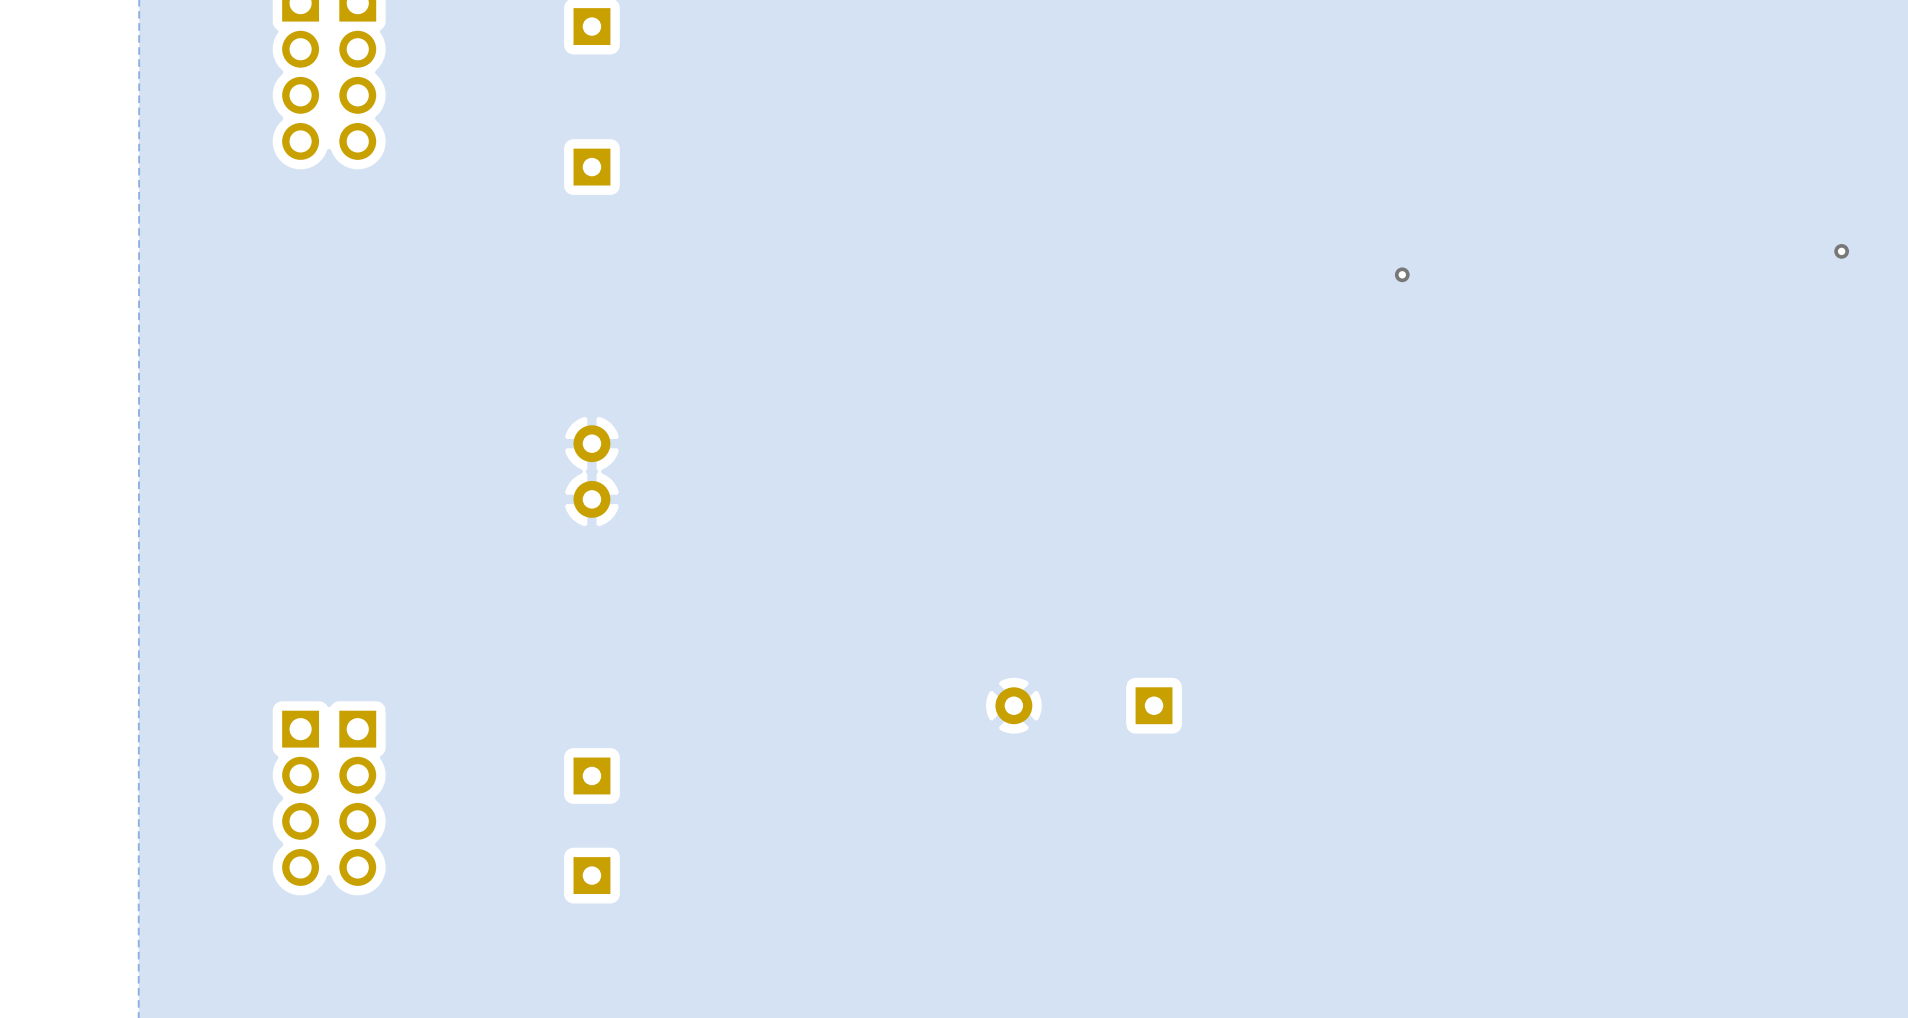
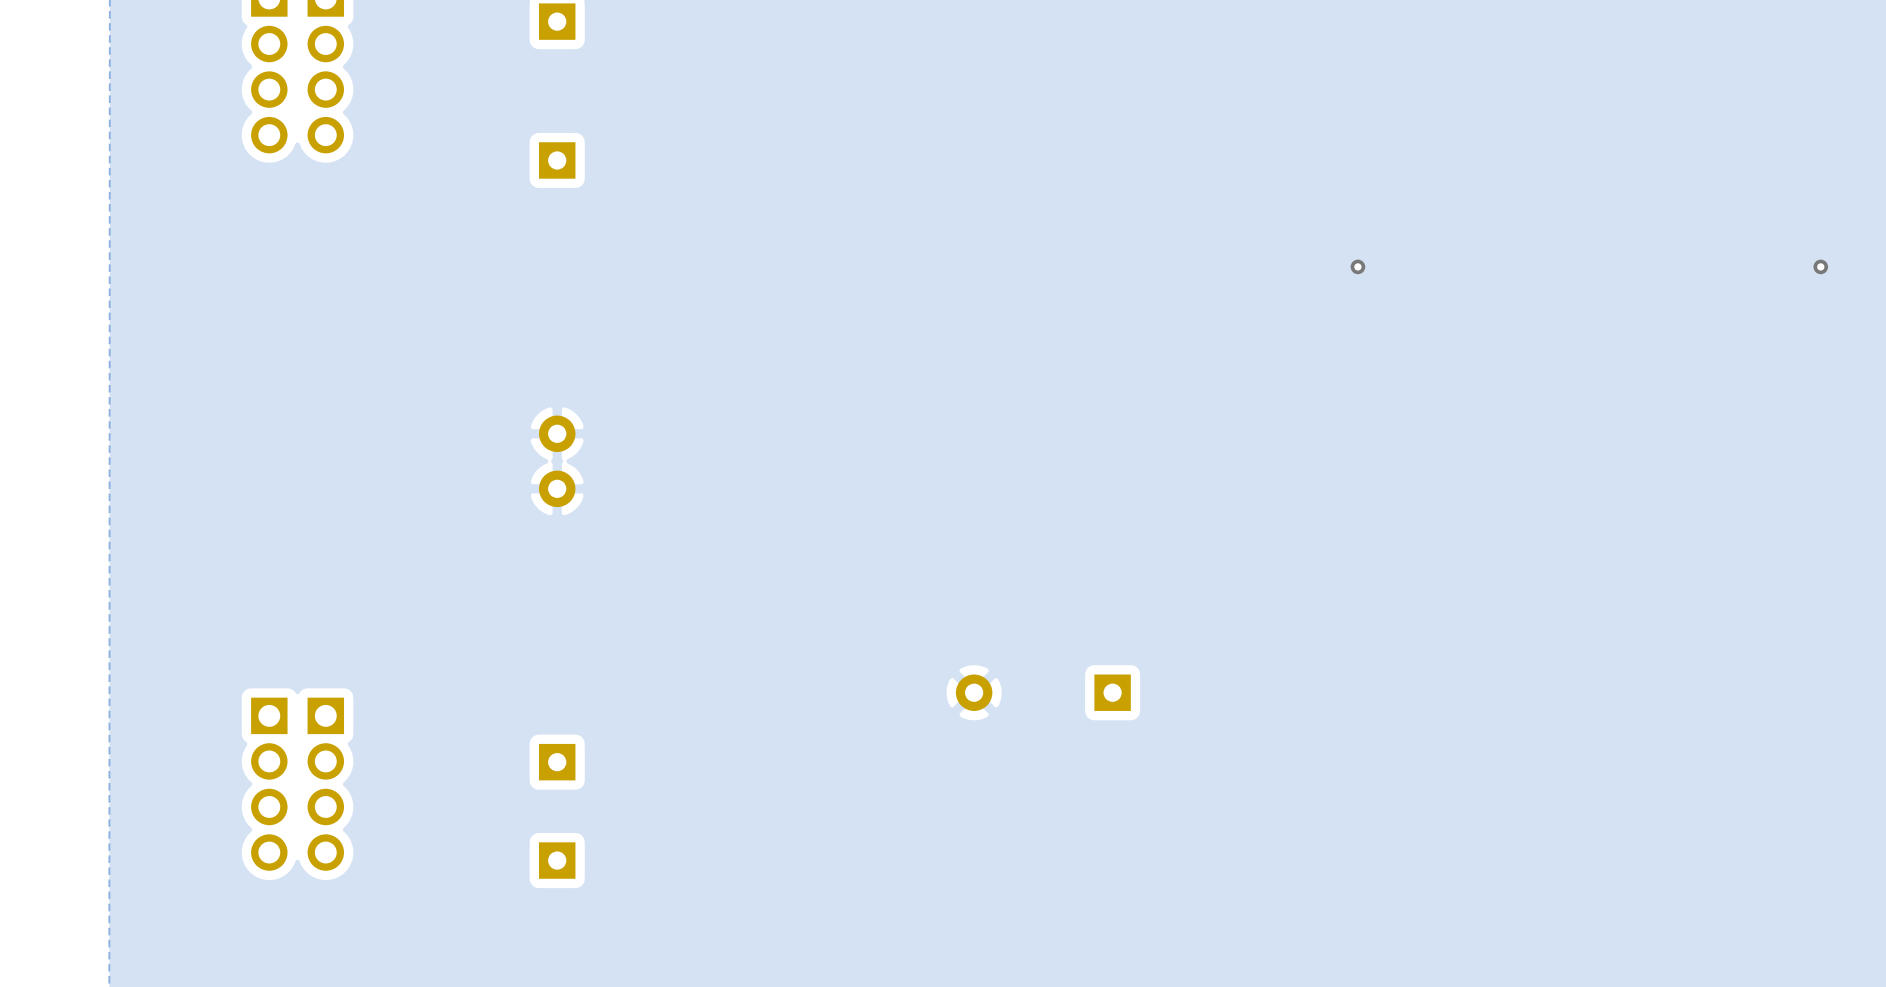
via position: (1841, 251) -> (1820, 266)

